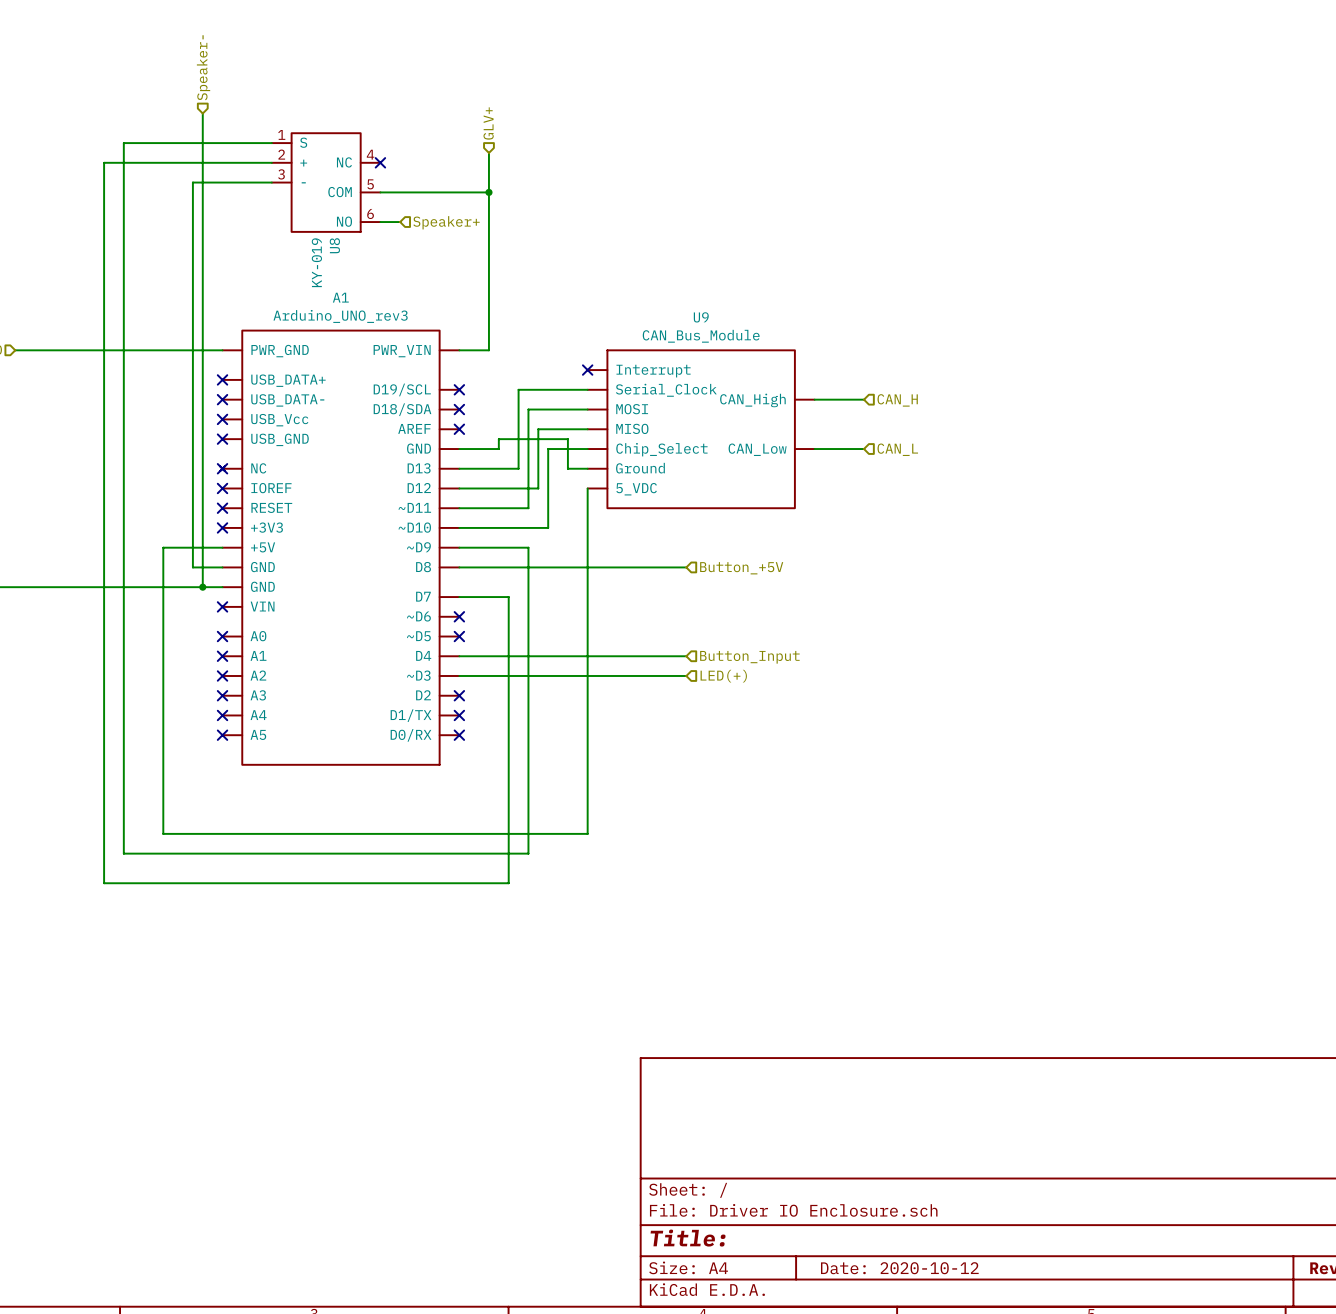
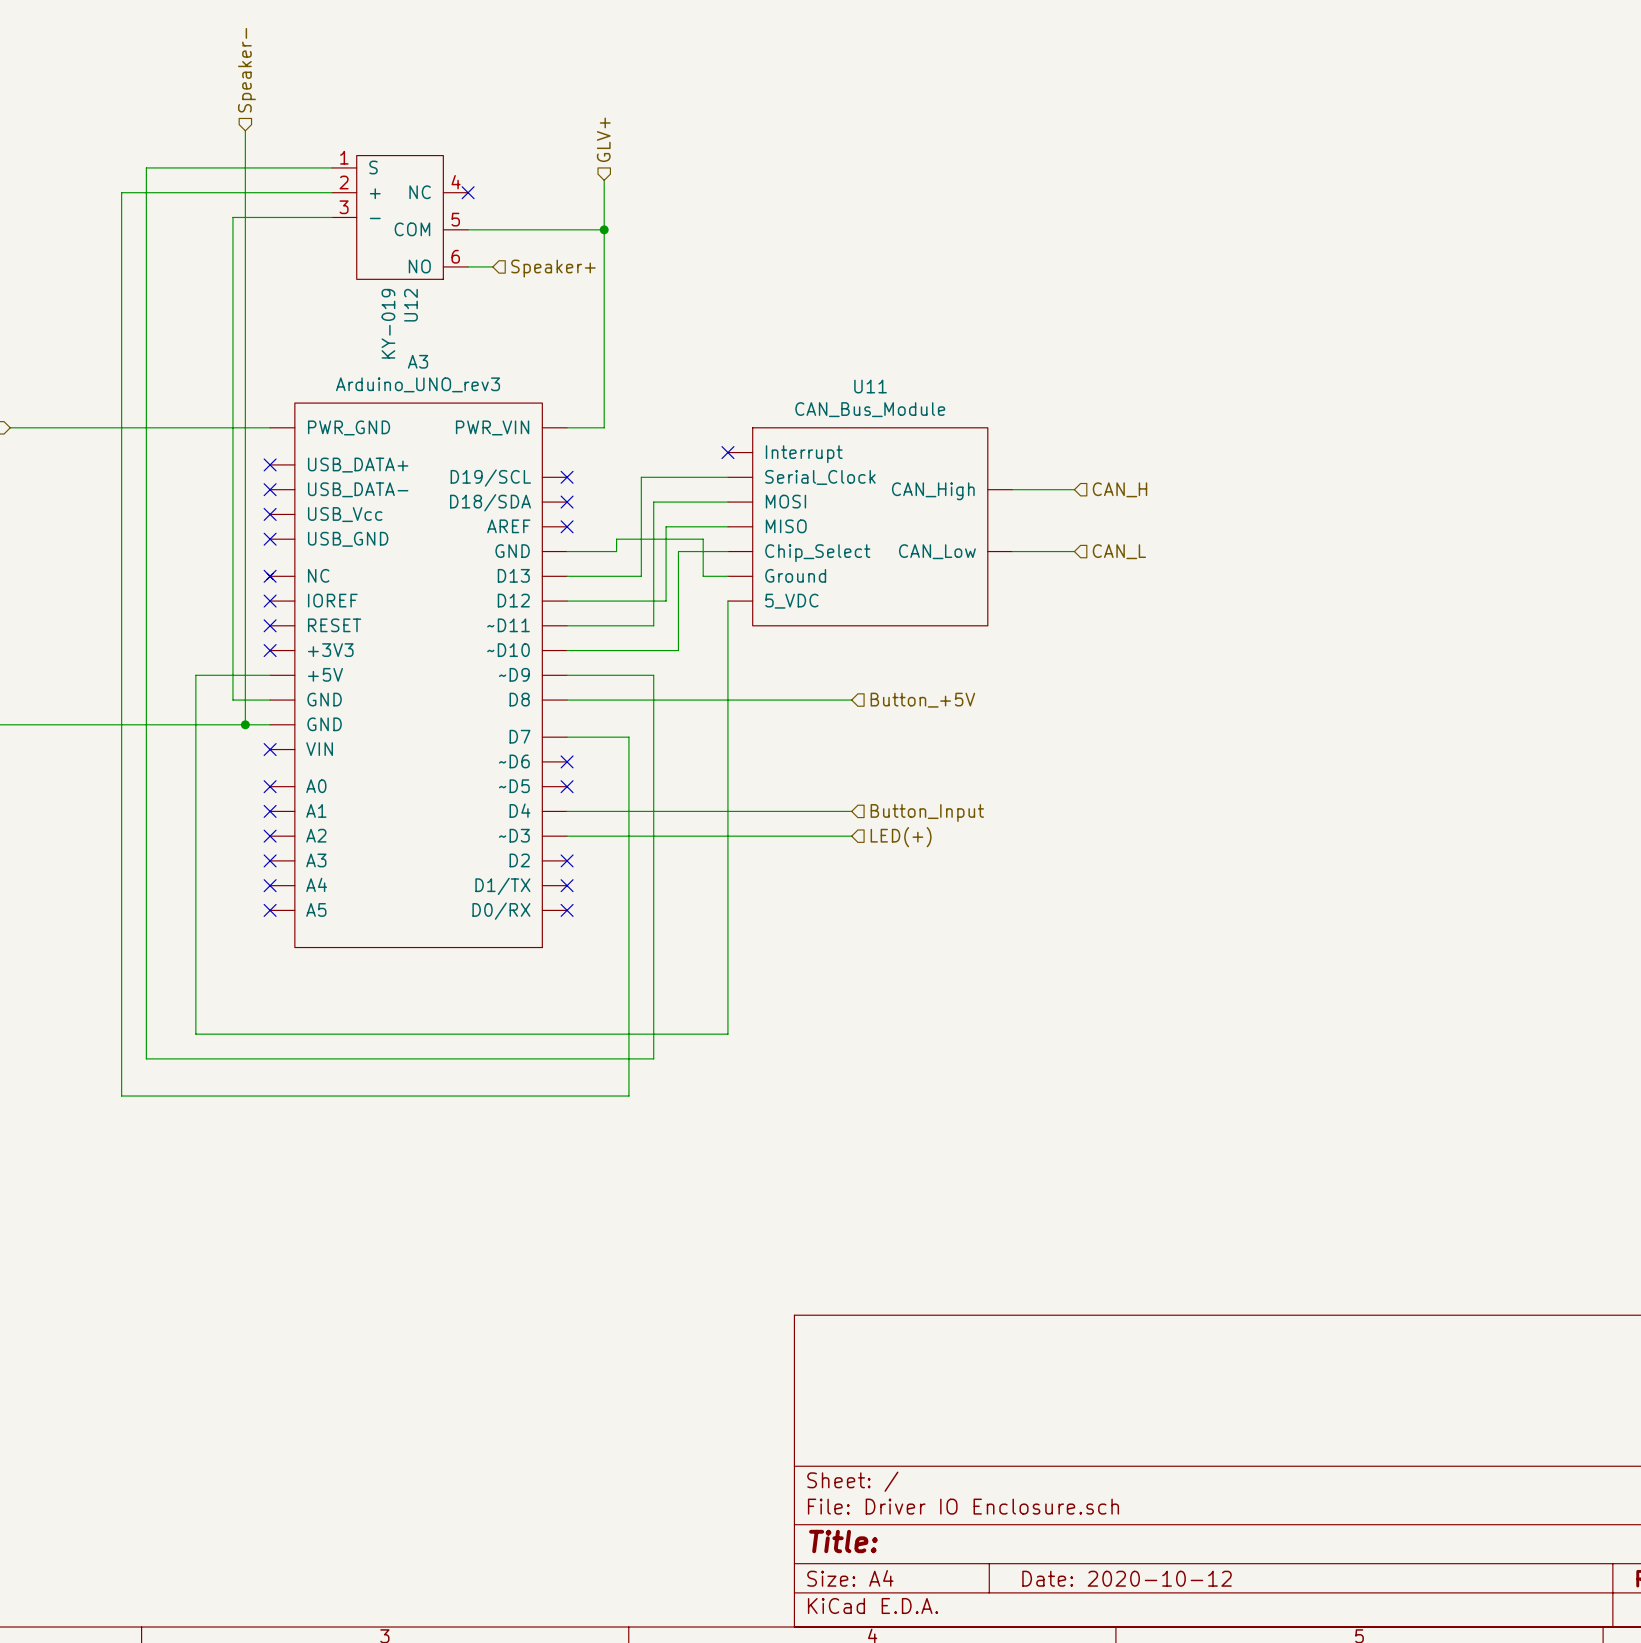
U8 name: U8 (334, 245) -> U12 (410, 305)
A1 name: A1 (340, 297) -> A3 (418, 361)
U9 name: U9 (701, 317) -> U11 (870, 386)

